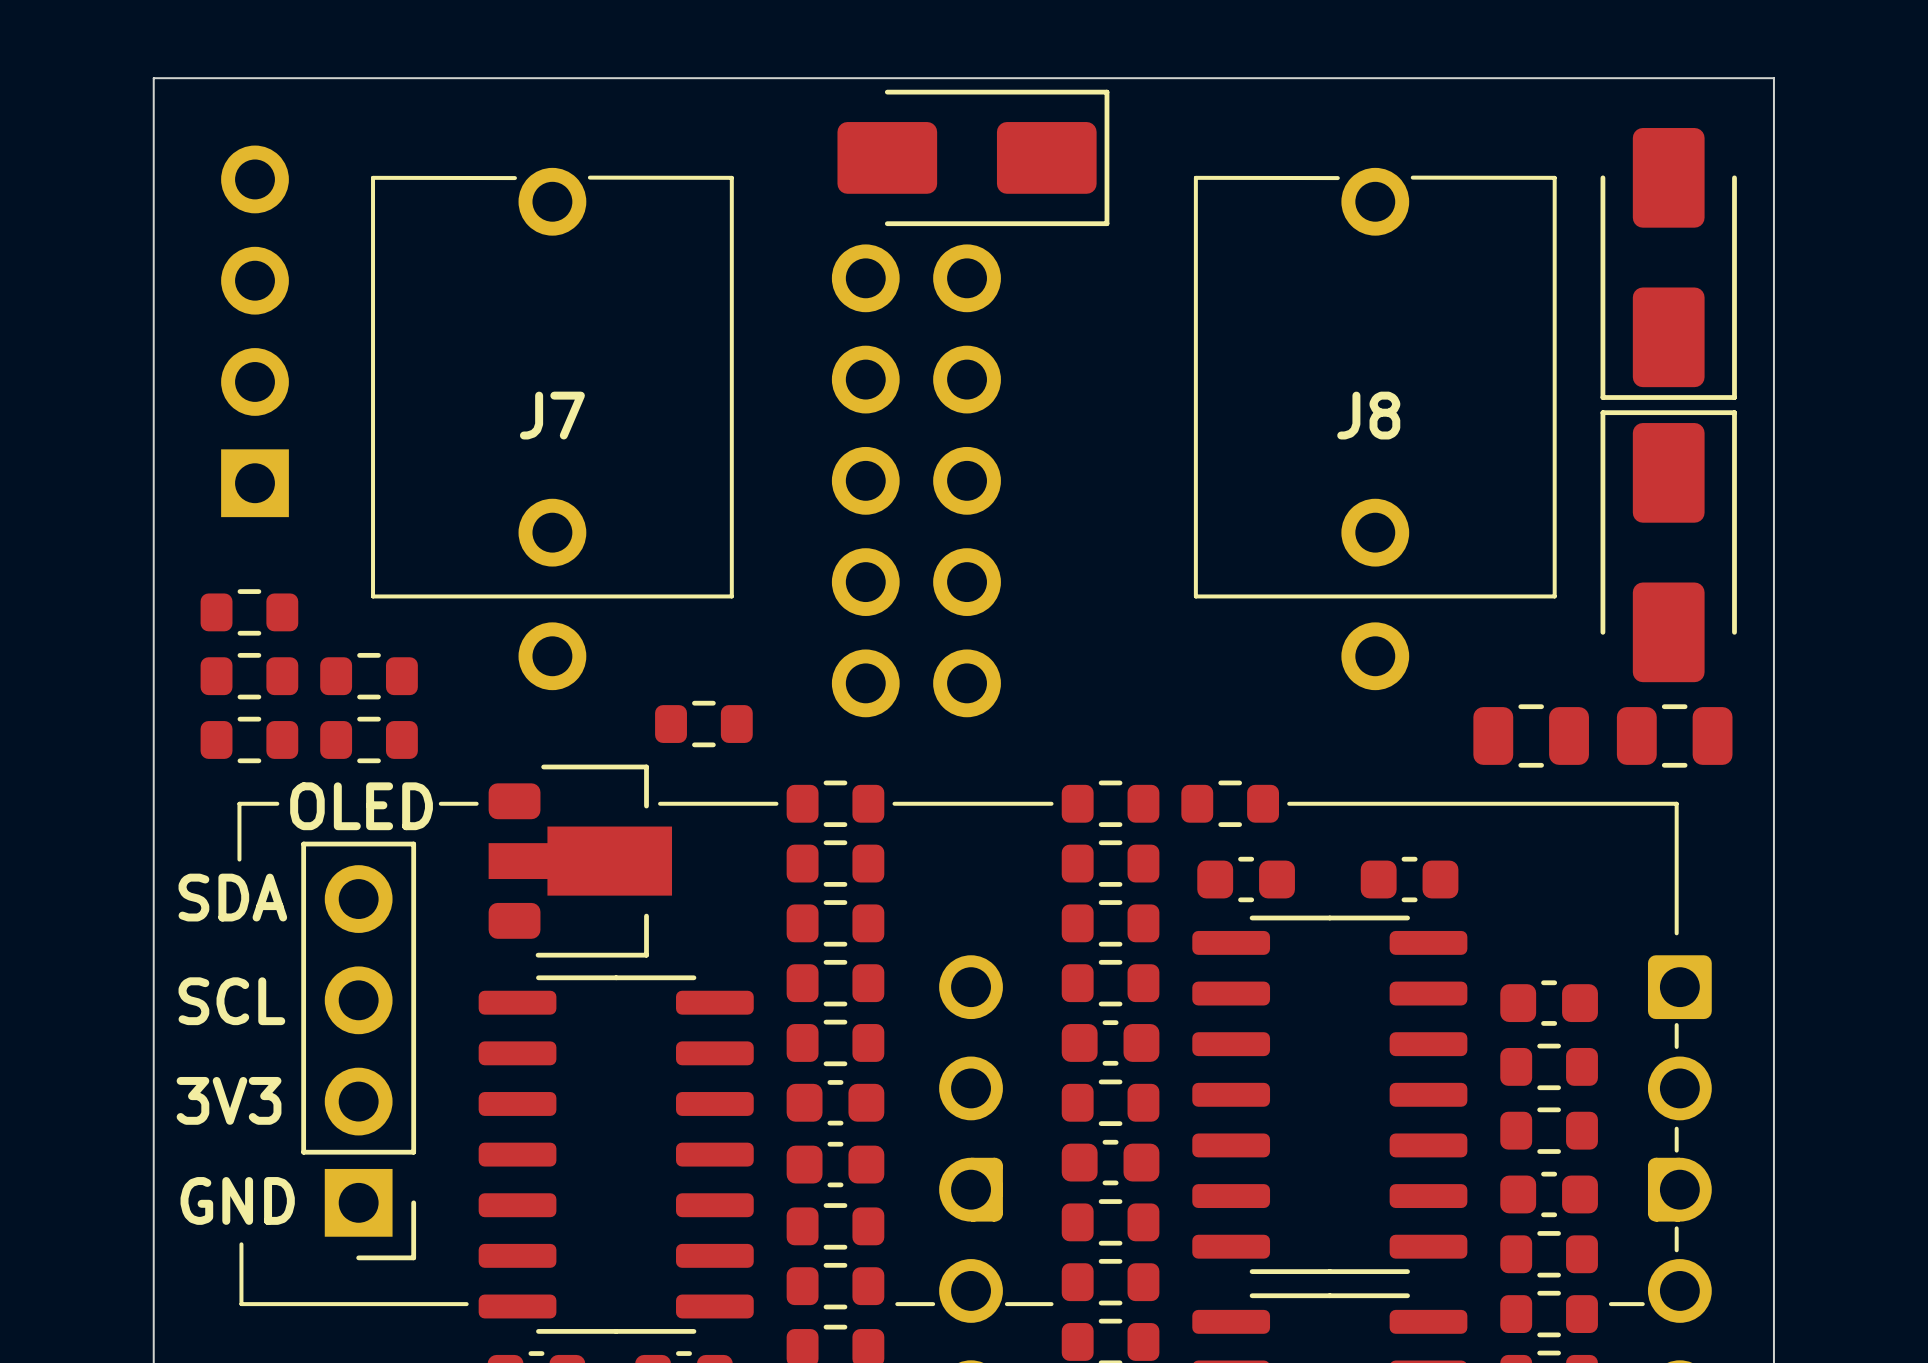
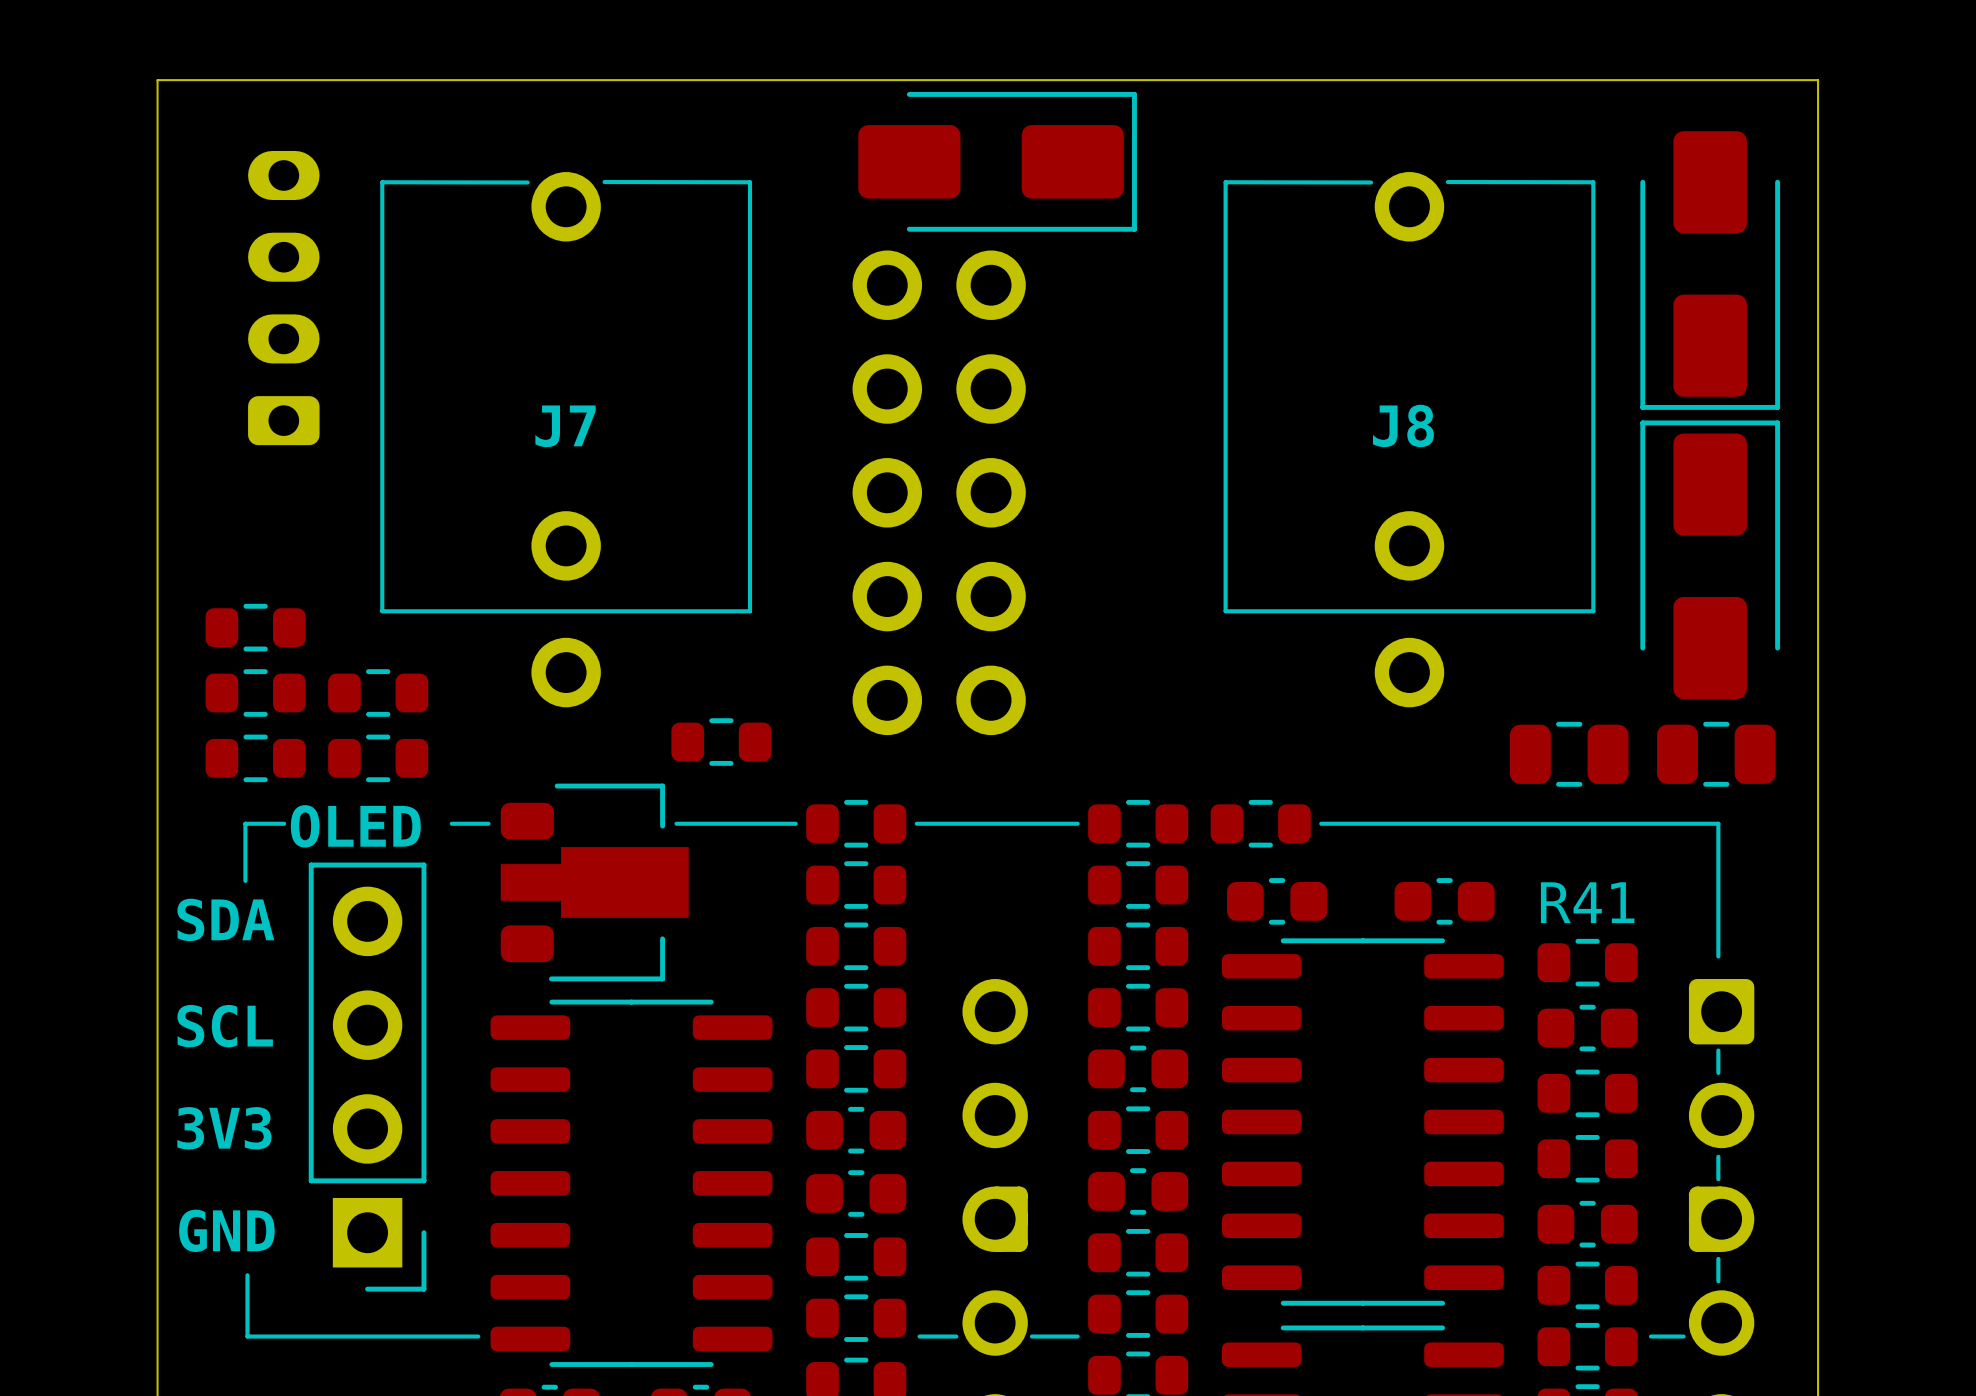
part: none -> (283, 298)
part: (255, 331) -> none
R41: none -> (1587, 962)

